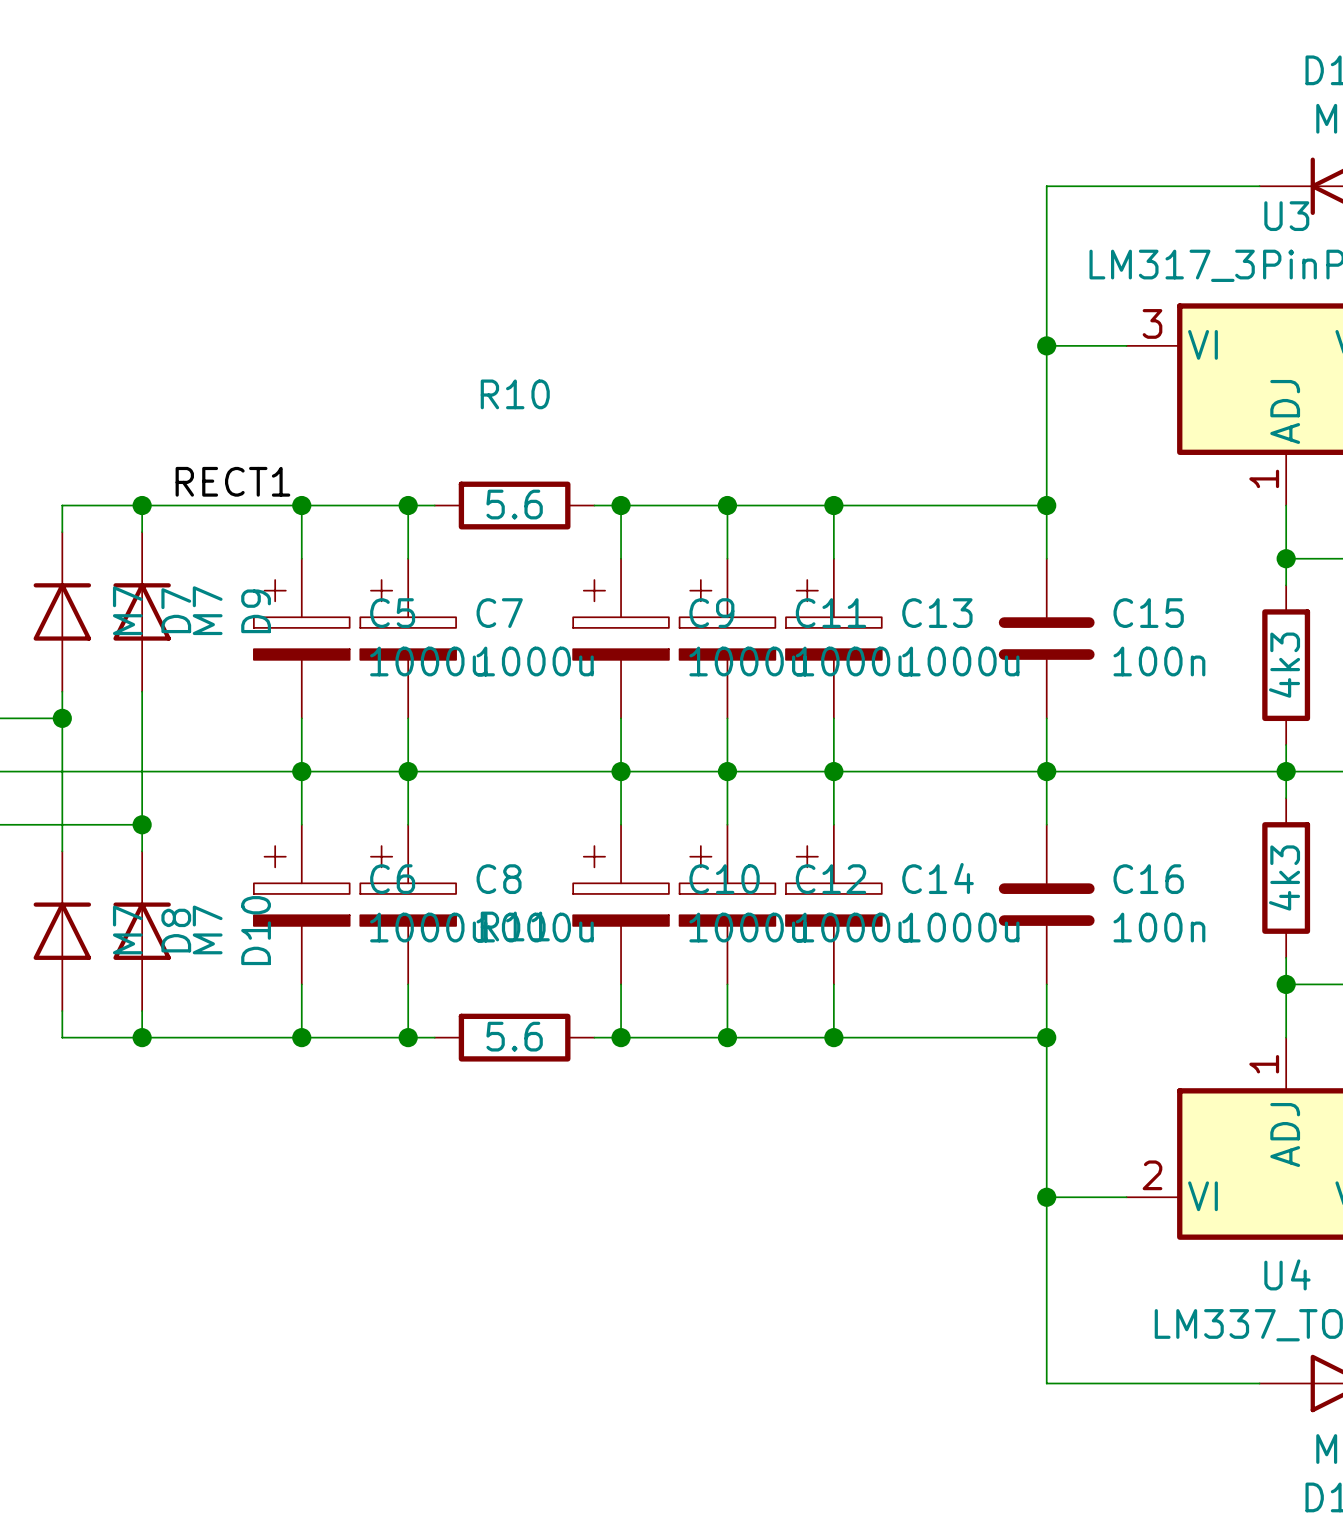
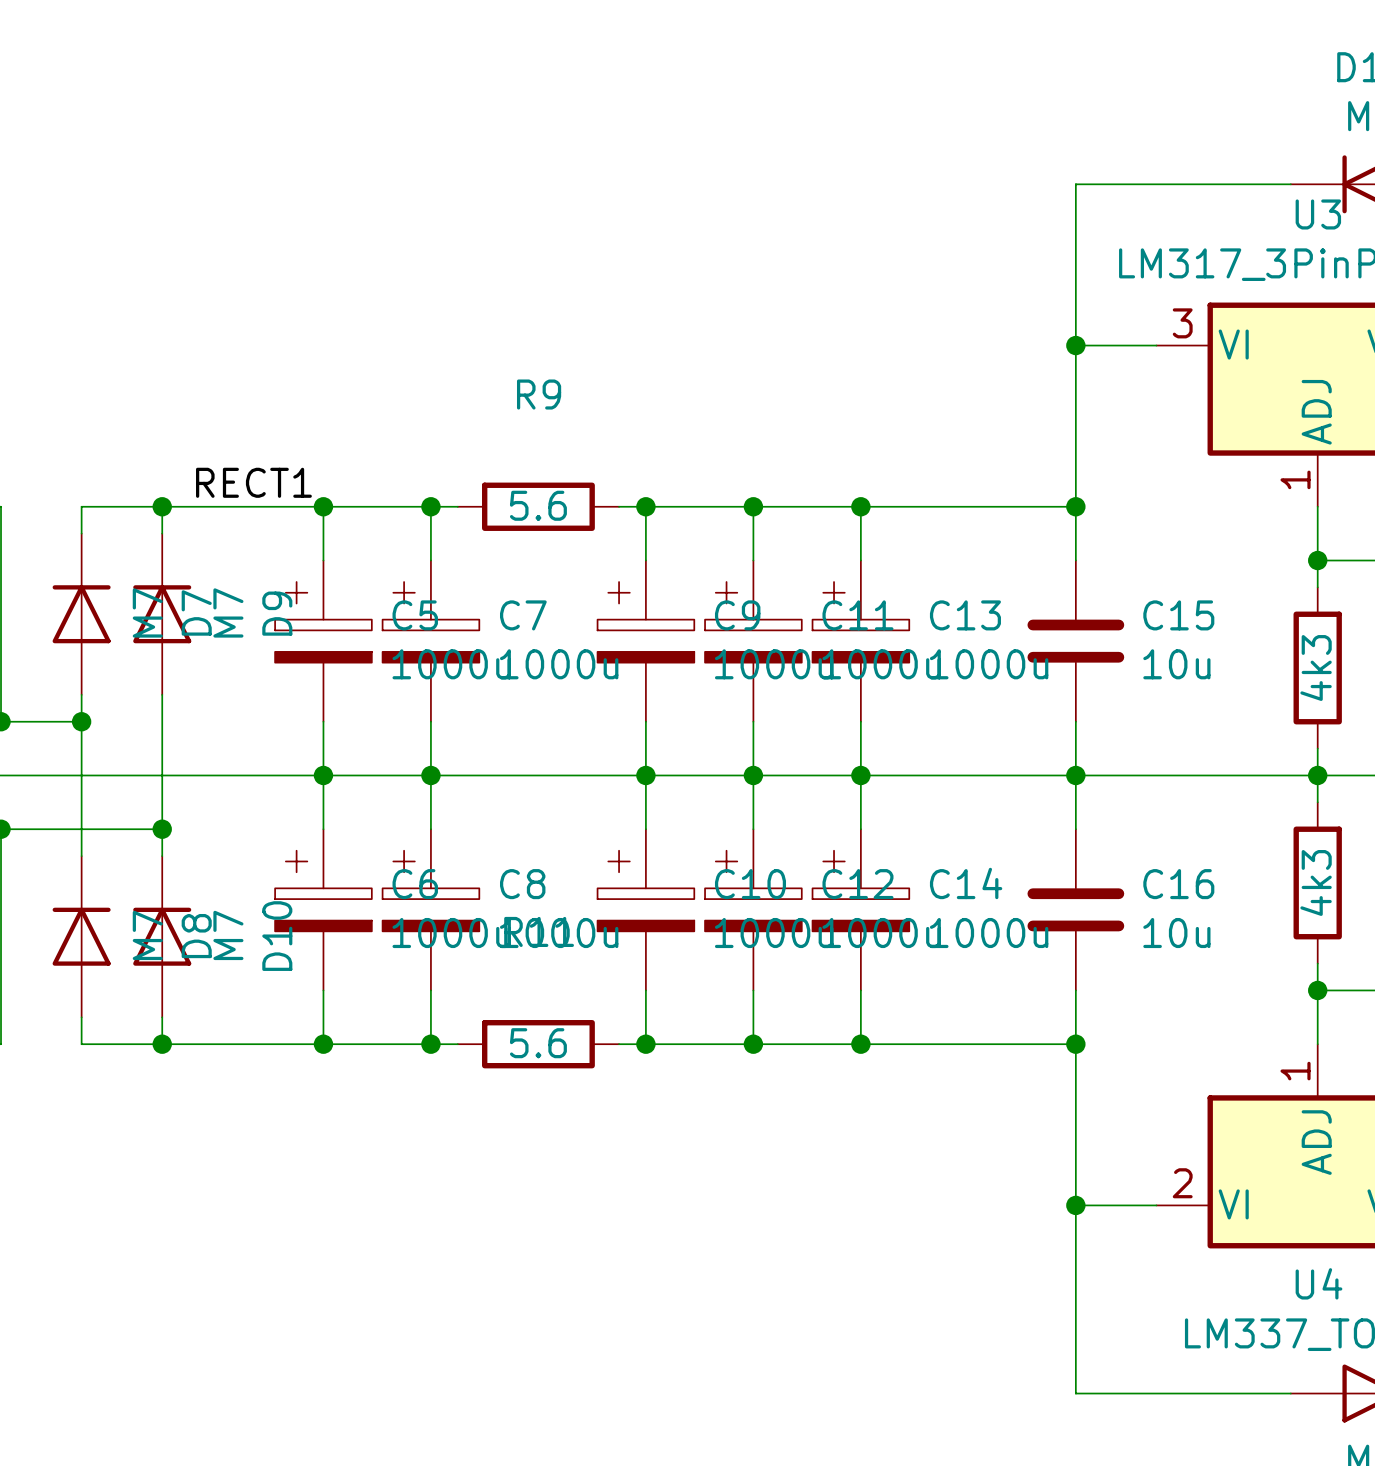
R10 name: R10 (515, 394) -> R9 (539, 394)
C15 value: 100n (1159, 661) -> 10u (1176, 664)
C16 value: 100n (1159, 927) -> 10u (1176, 933)

